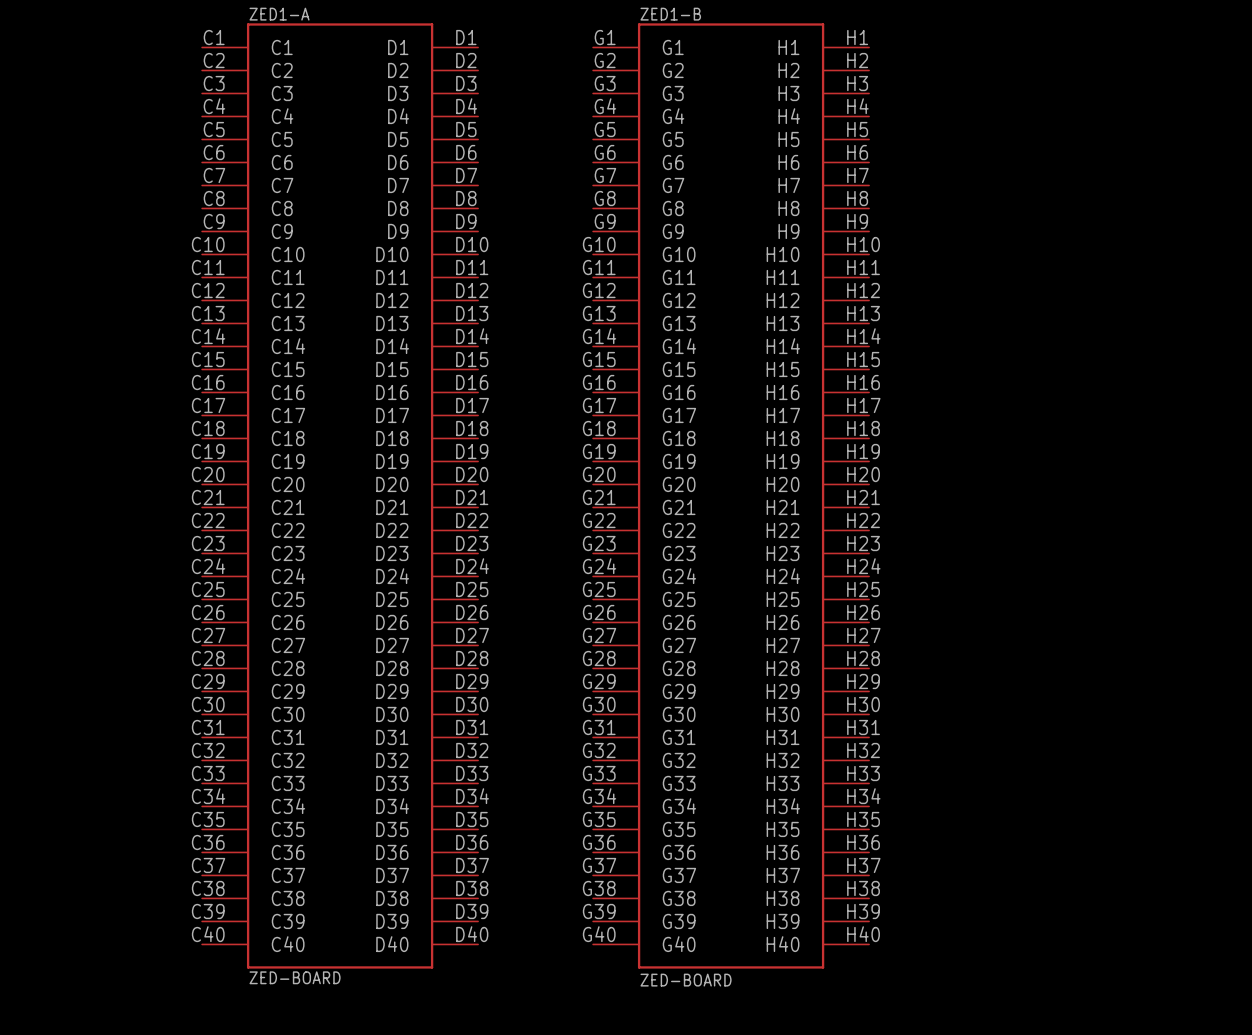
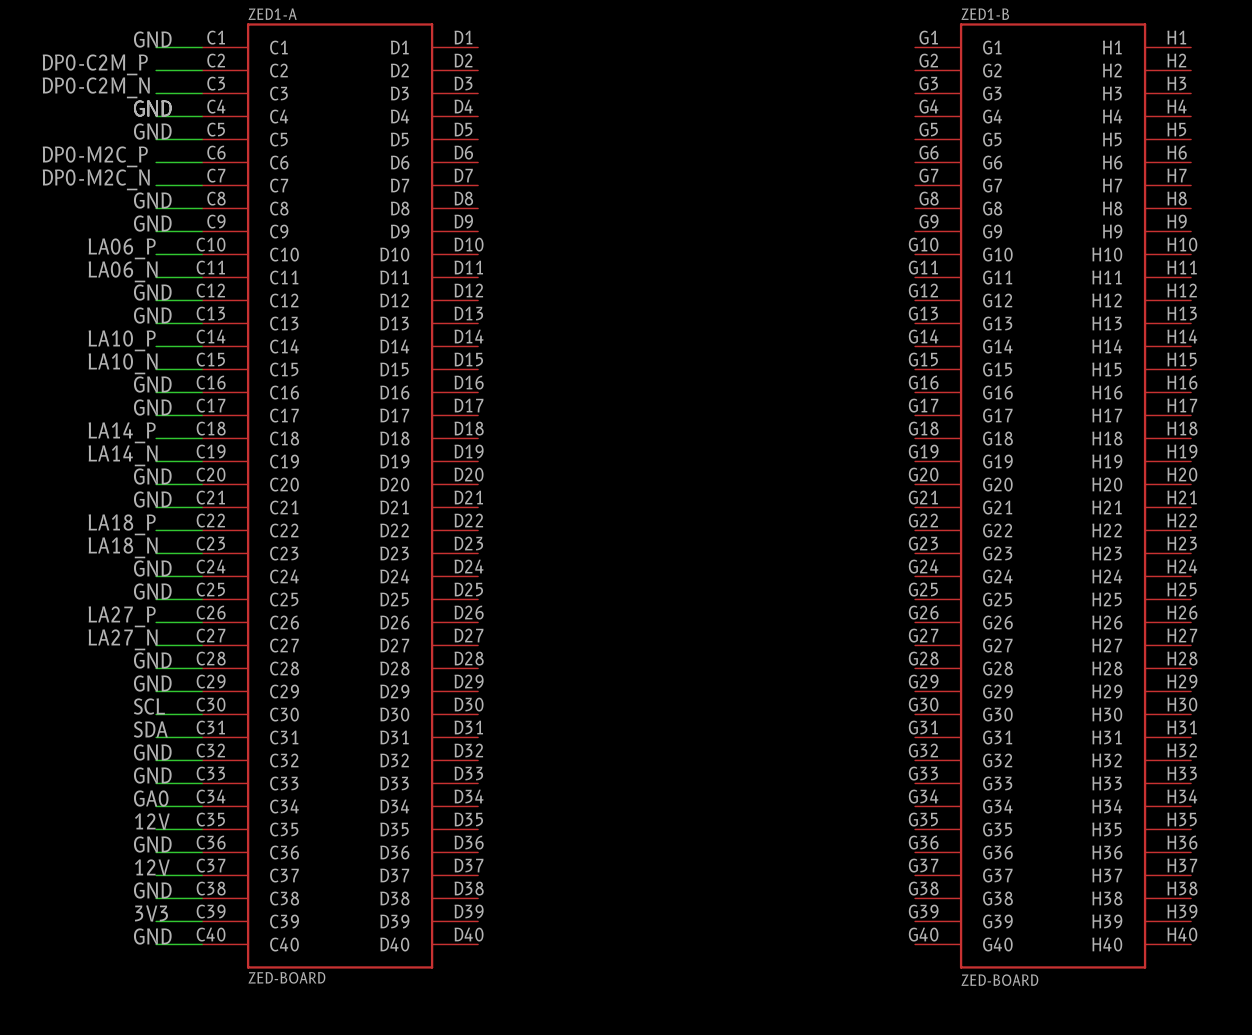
label: none -> GND (152, 39)
wire: none -> (156, 47) (202, 47)
label: none -> DP0-C2M_P (95, 64)
wire: none -> (156, 70) (202, 70)
label: none -> DP0-C2M_N (96, 87)
wire: none -> (156, 93) (202, 93)
label: none -> GND (152, 108)
wire: none -> (156, 116) (202, 116)
label: none -> GND (152, 131)
wire: none -> (156, 139) (202, 139)
label: none -> DP0-M2C_P (95, 156)
wire: none -> (156, 162) (202, 162)
label: none -> DP0-M2C_N (96, 179)
wire: none -> (156, 185) (202, 185)
label: none -> GND (152, 200)
wire: none -> (156, 208) (202, 208)
label: none -> GND (152, 223)
wire: none -> (156, 231) (202, 231)
label: none -> LA06_P (122, 248)
wire: none -> (156, 254) (202, 254)
label: none -> LA06_N (123, 271)
wire: none -> (156, 277) (202, 277)
label: none -> GND (152, 292)
wire: none -> (156, 300) (202, 300)
label: none -> GND (152, 315)
wire: none -> (156, 323) (202, 323)
label: none -> LA10_P (122, 340)
wire: none -> (156, 346) (202, 346)
label: none -> LA10_N (123, 363)
wire: none -> (156, 369) (202, 369)
label: none -> GND (152, 384)
wire: none -> (156, 392) (202, 392)
label: none -> GND (152, 407)
wire: none -> (156, 415) (202, 415)
label: none -> LA14_P (122, 432)
wire: none -> (156, 438) (202, 438)
label: none -> LA14_N (123, 455)
wire: none -> (156, 461) (202, 461)
label: none -> GND (152, 476)
wire: none -> (156, 484) (202, 484)
ZED1-B position: (731, 495) -> (1053, 495)
label: none -> GND (152, 499)
wire: none -> (156, 507) (202, 507)
label: none -> LA18_P (122, 524)
wire: none -> (156, 530) (202, 530)
label: none -> LA18_N (123, 547)
wire: none -> (156, 553) (202, 553)
label: none -> GND (152, 568)
wire: none -> (156, 576) (202, 576)
label: none -> GND (152, 591)
wire: none -> (156, 599) (202, 599)
label: none -> LA27_P (122, 616)
wire: none -> (156, 622) (202, 622)
label: none -> LA27_N (123, 639)
wire: none -> (156, 645) (202, 645)
label: none -> GND (152, 660)
wire: none -> (156, 668) (202, 668)
label: none -> GND (152, 683)
wire: none -> (156, 691) (202, 691)
label: none -> SCL (149, 706)
wire: none -> (156, 714) (202, 714)
label: none -> SDA (150, 729)
wire: none -> (156, 737) (202, 737)
label: none -> GND (152, 752)
wire: none -> (156, 760) (202, 760)
label: none -> GND (152, 775)
wire: none -> (156, 783) (202, 783)
label: none -> GA0 (151, 798)
wire: none -> (156, 806) (202, 806)
label: none -> 12V (152, 821)
wire: none -> (156, 829) (202, 829)
label: none -> GND (152, 844)
wire: none -> (156, 852) (202, 852)
label: none -> 12V (152, 867)
wire: none -> (156, 875) (202, 875)
label: none -> GND (152, 890)
wire: none -> (156, 898) (202, 898)
label: none -> 3V3 (151, 913)
wire: none -> (156, 921) (202, 921)
label: none -> GND (152, 936)
wire: none -> (156, 944) (202, 944)

